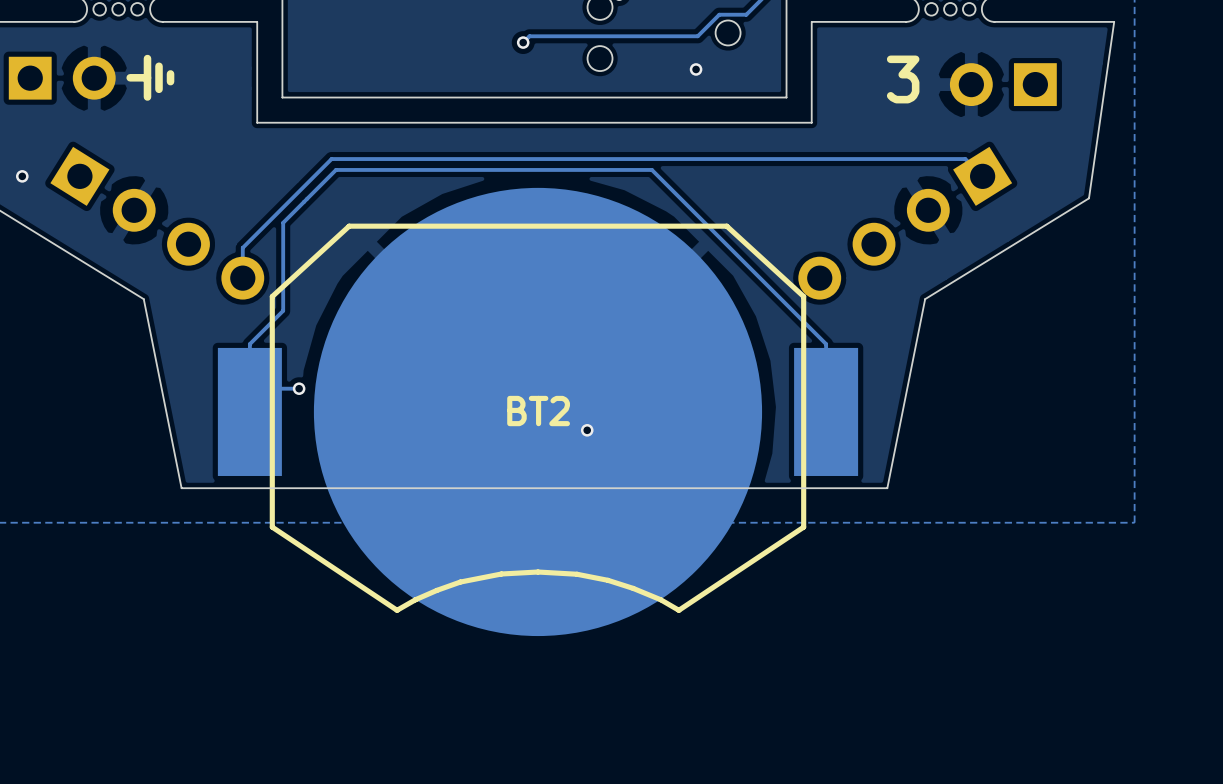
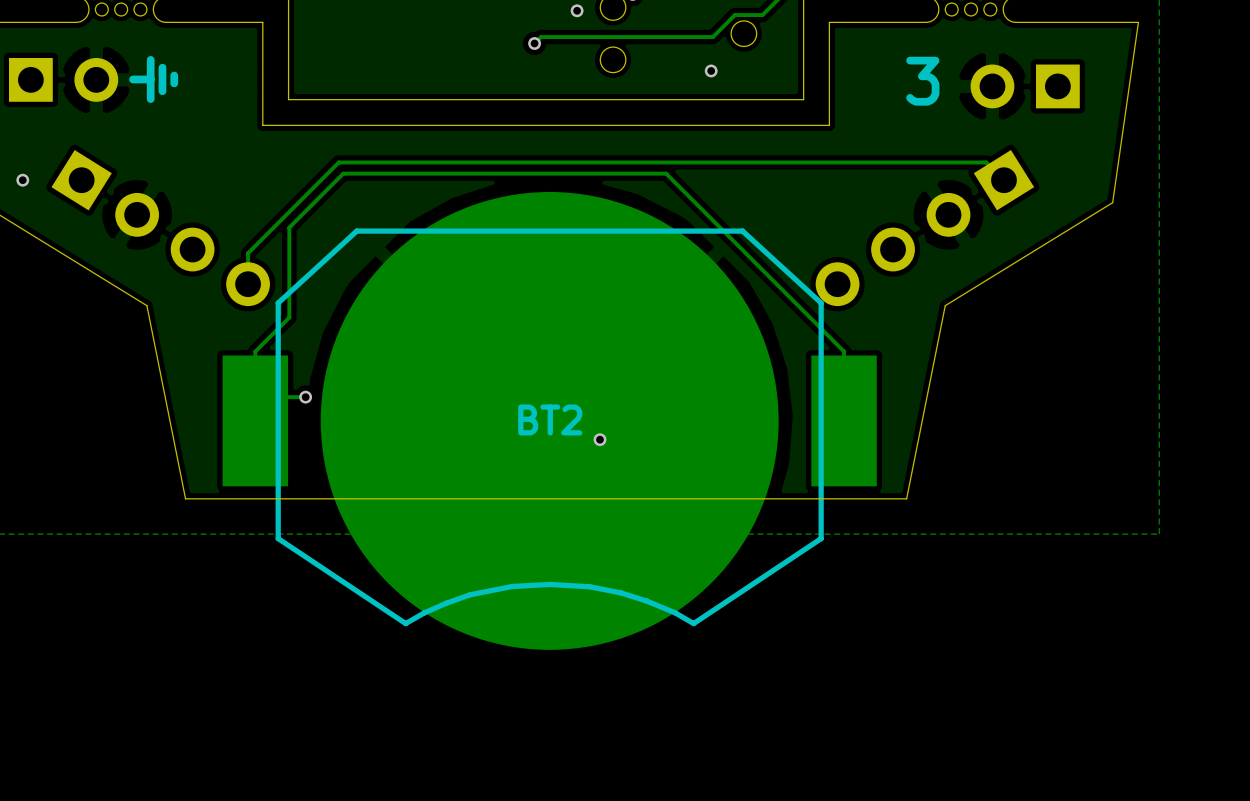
via: none -> (577, 10)

